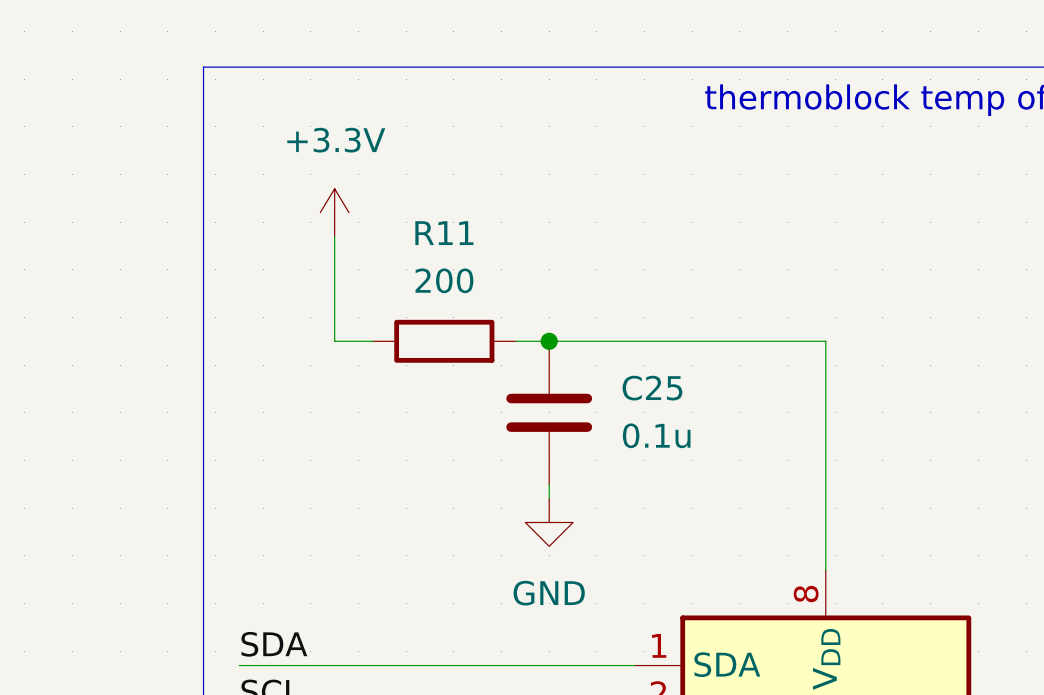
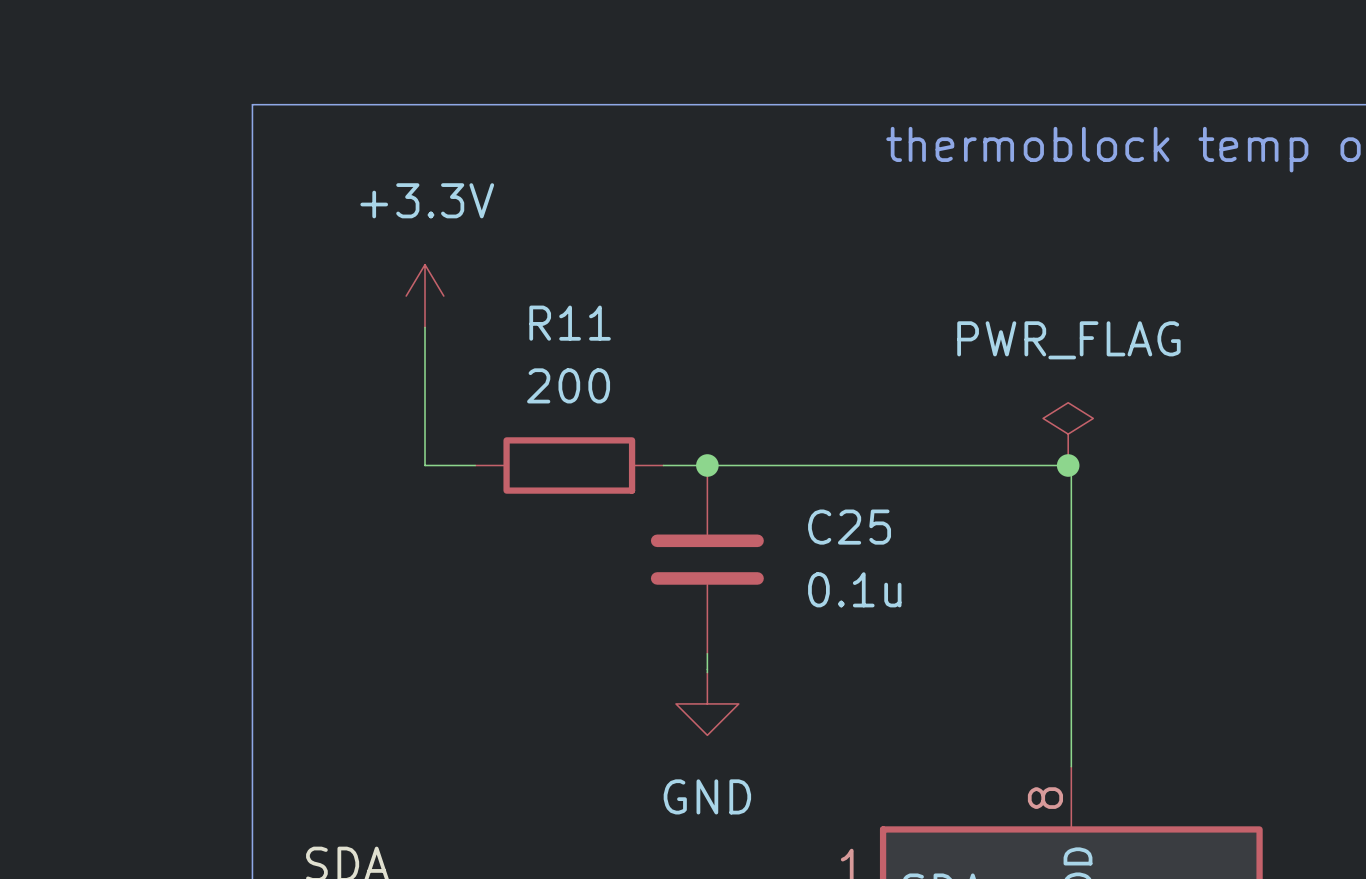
power symbol: none -> PWR_FLAG (1068, 434)
junction: none -> (1068, 465)

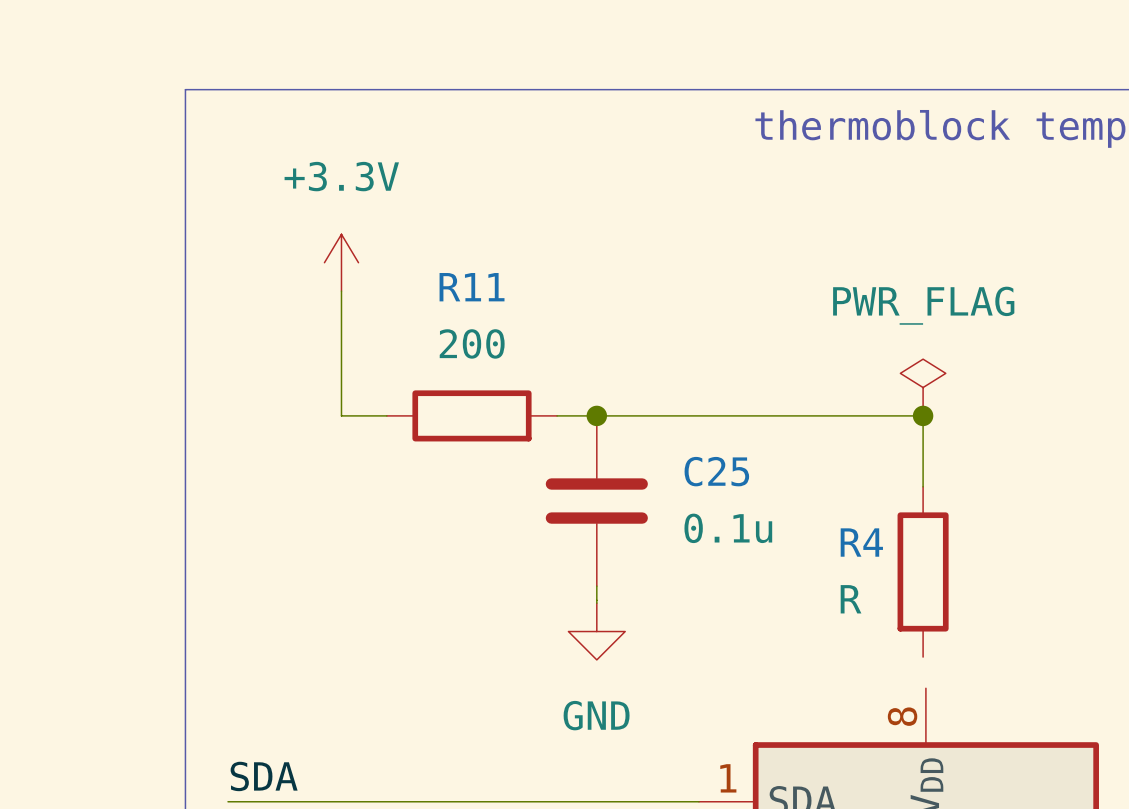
wire: (1068, 465) (1071, 465) (1071, 766) -> (923, 415) (923, 486)
R4: none -> R (923, 571)

